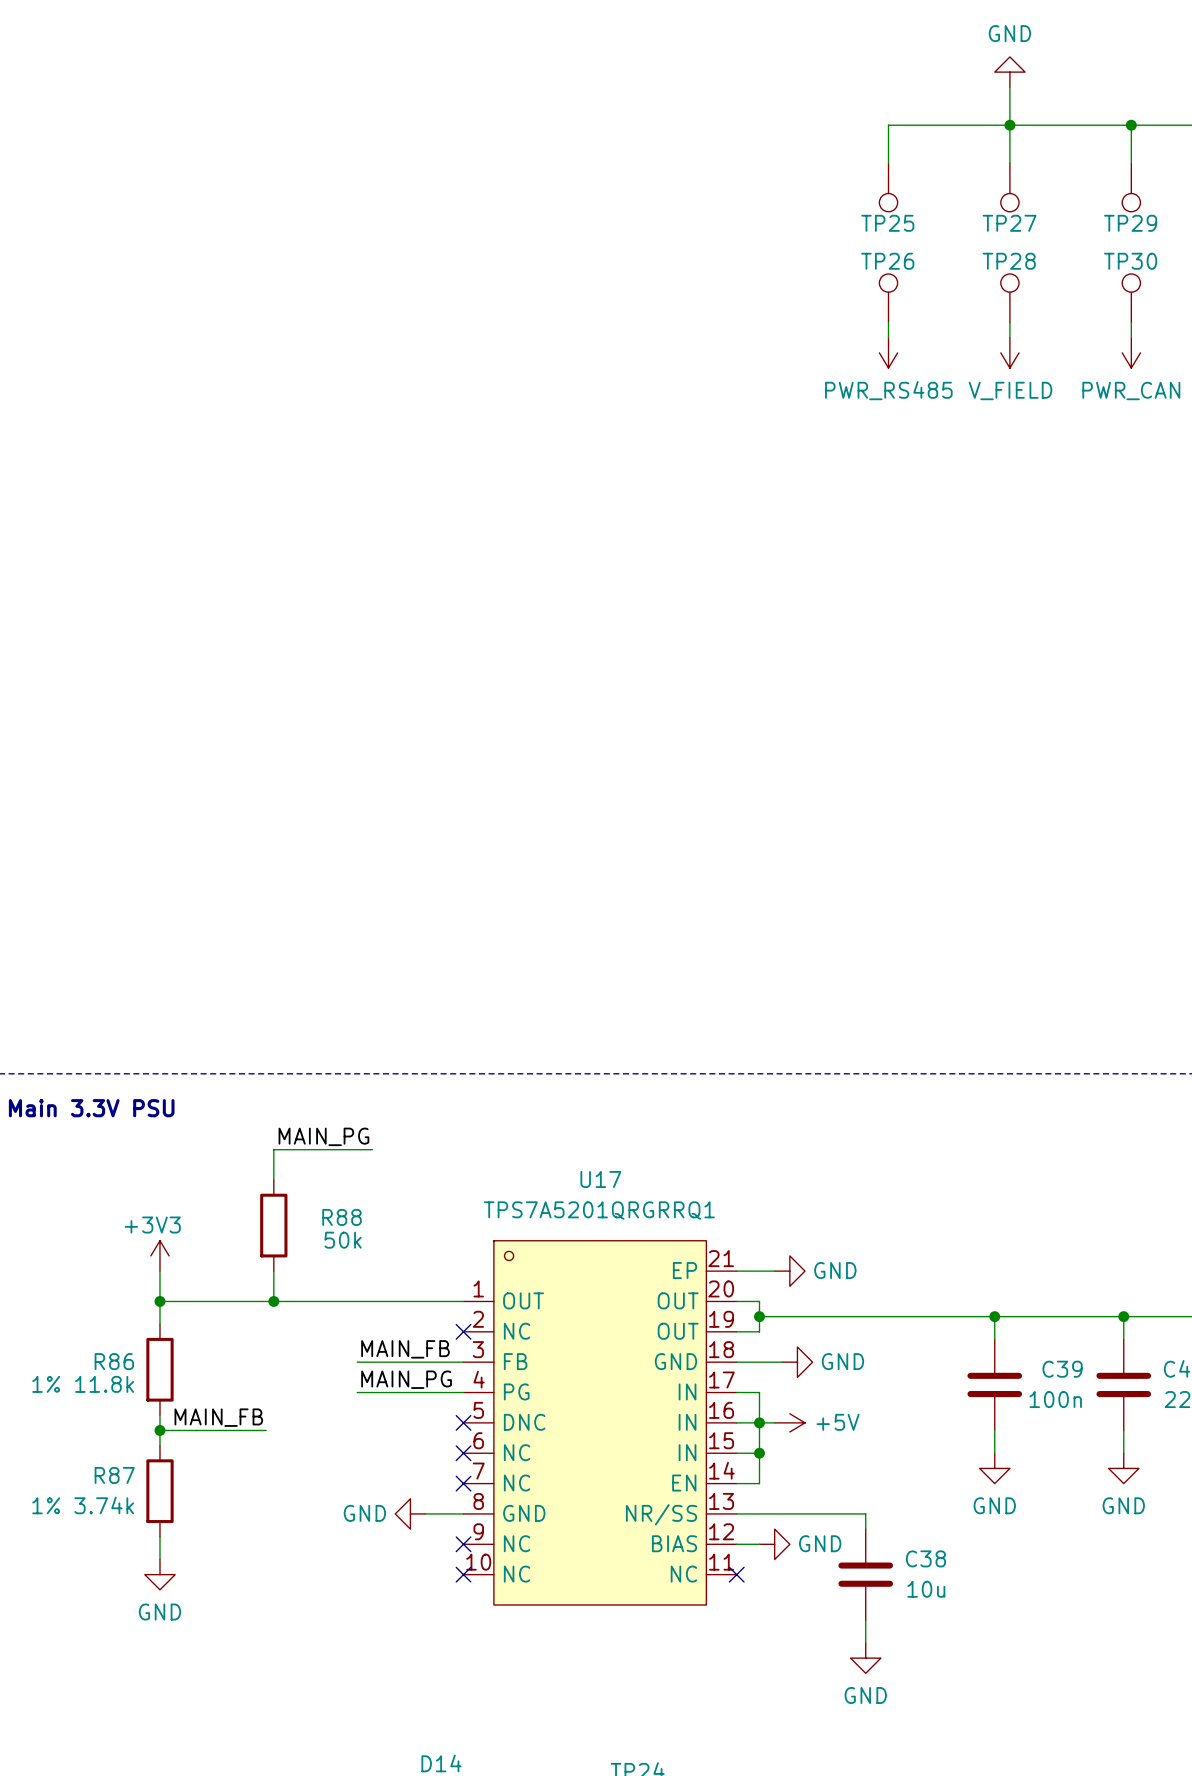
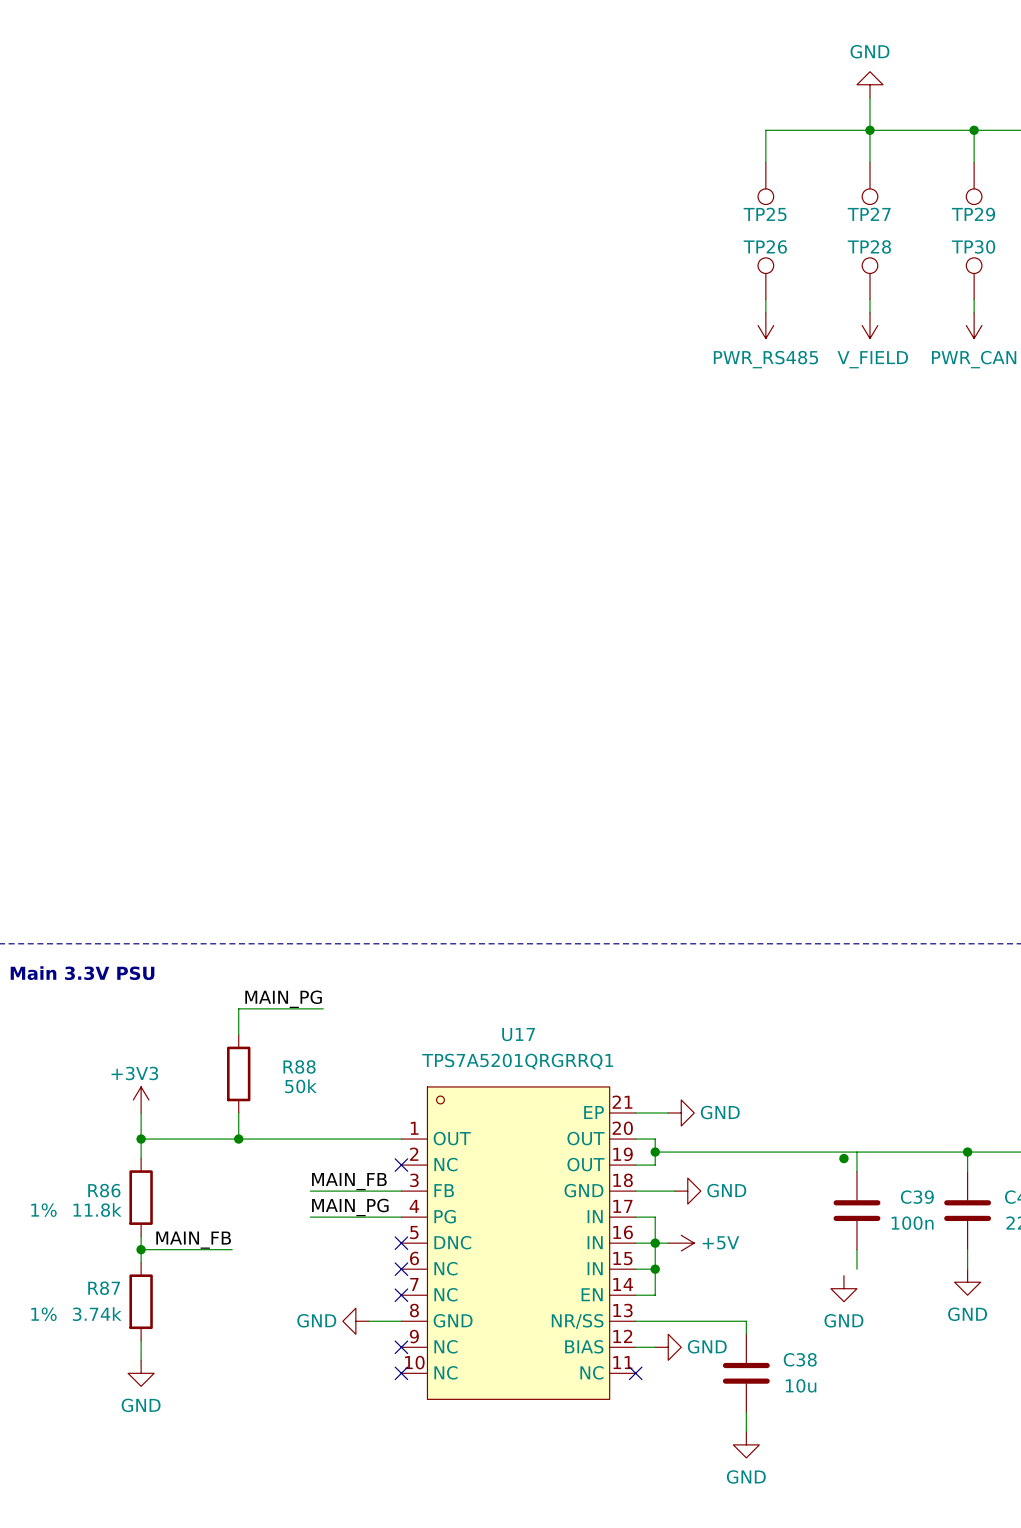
junction position: (994, 1316) -> (843, 1158)
power symbol position: GND (994, 1468) -> GND (843, 1288)

